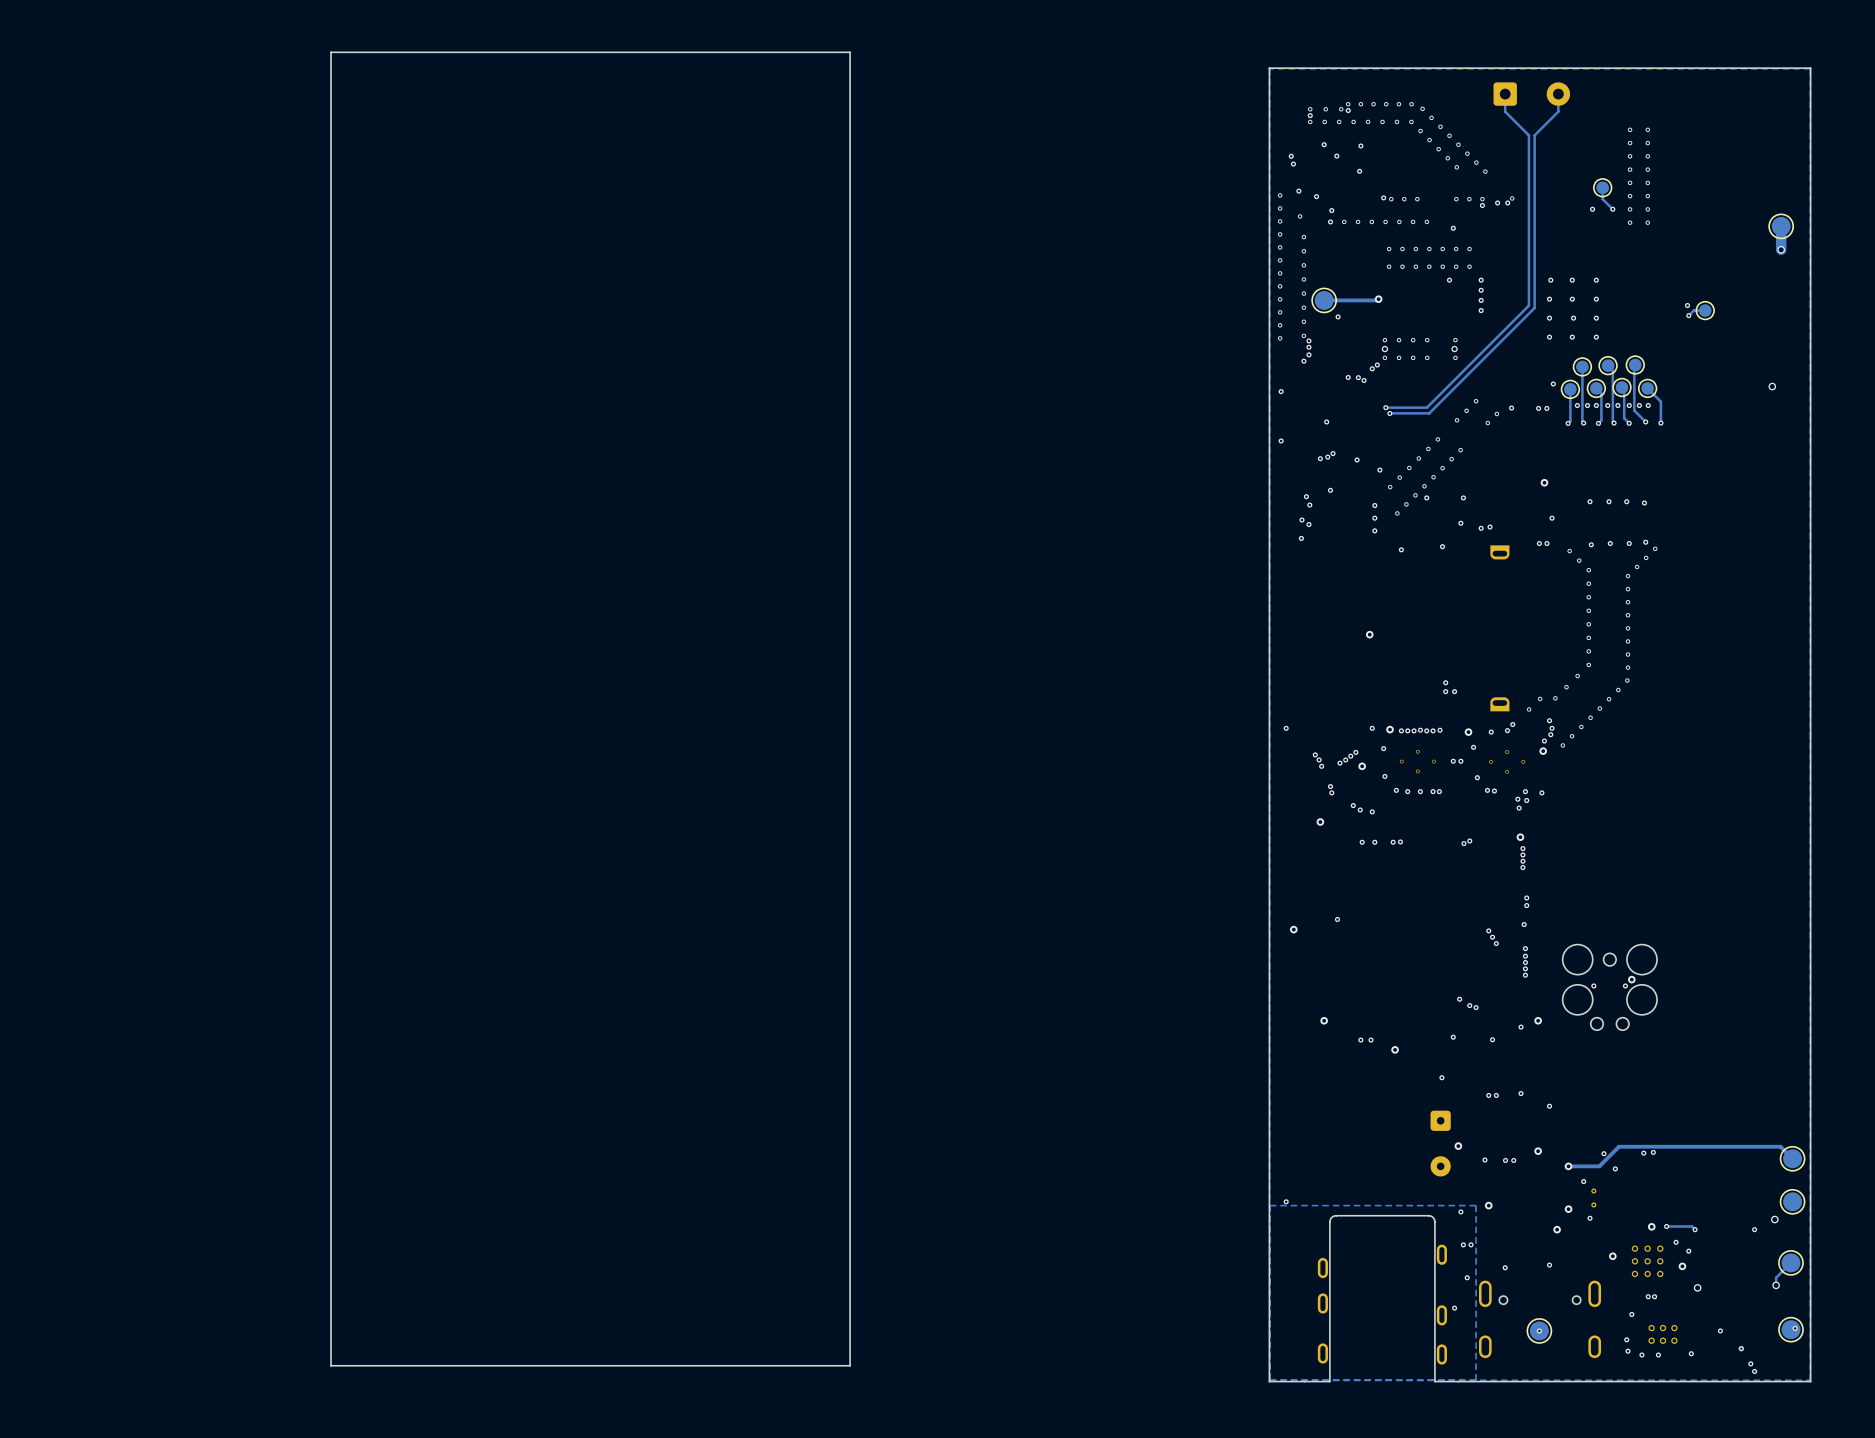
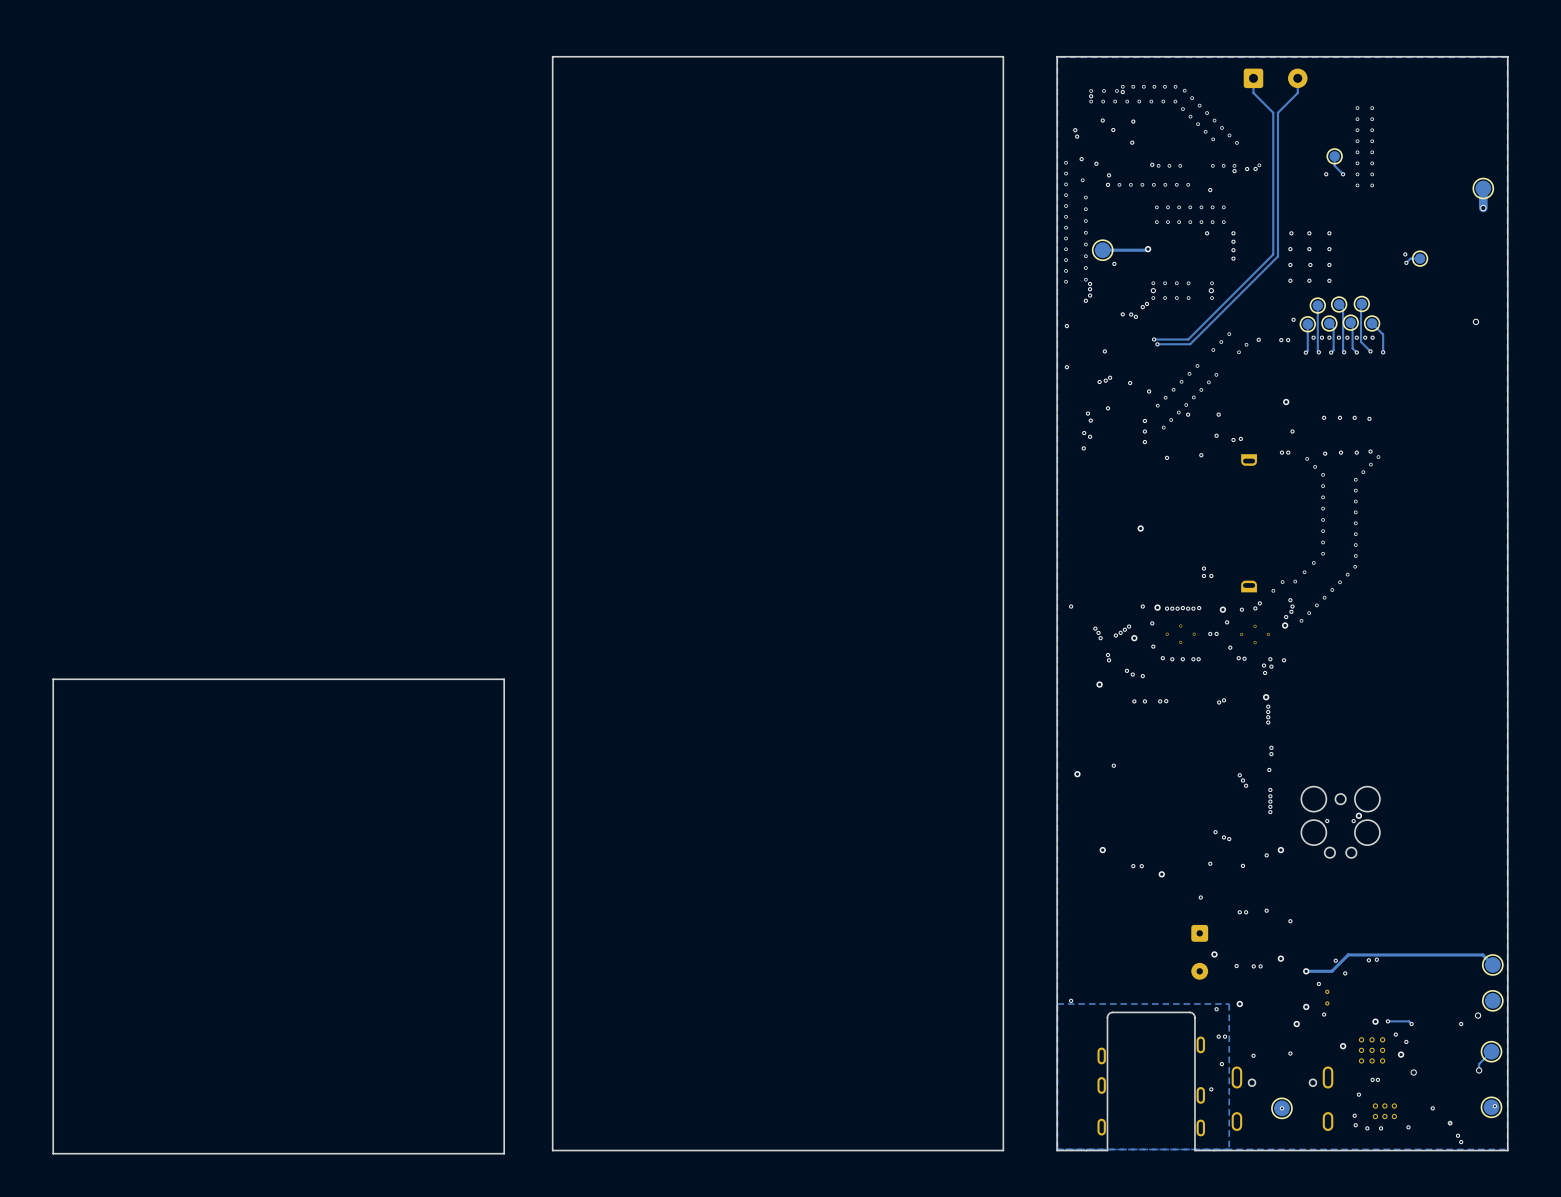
board edge: (850, 52) (331, 52) (331, 1365) (850, 1365) (850, 52) -> none
board edge: none -> (1003, 56) (552, 56) (552, 1150) (1003, 1150) (1003, 56)
board edge: none -> (504, 679) (53, 679) (53, 1153) (504, 1153) (504, 679)

